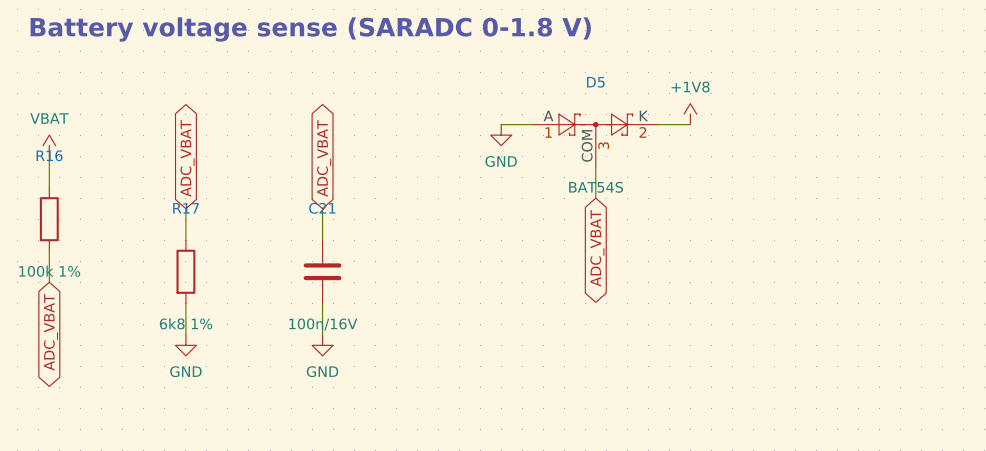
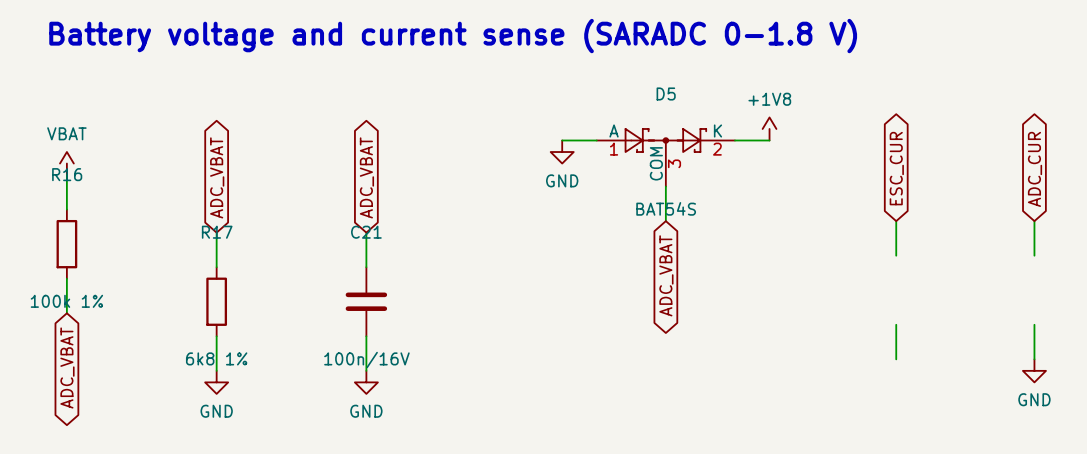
text: Battery voltage sense (SARADC 0-1.8 V) (310, 29) -> Battery voltage and current sense (SARADC 0-1.8 V) (453, 36)
global label: none -> ESC_CUR (896, 168)
global label: none -> ADC_CUR (1035, 169)
wire: none -> (896, 221) (896, 255)
wire: none -> (1034, 221) (1034, 255)
wire: none -> (896, 324) (896, 359)
wire: none -> (1034, 324) (1034, 359)
power symbol: none -> GND (1034, 370)

